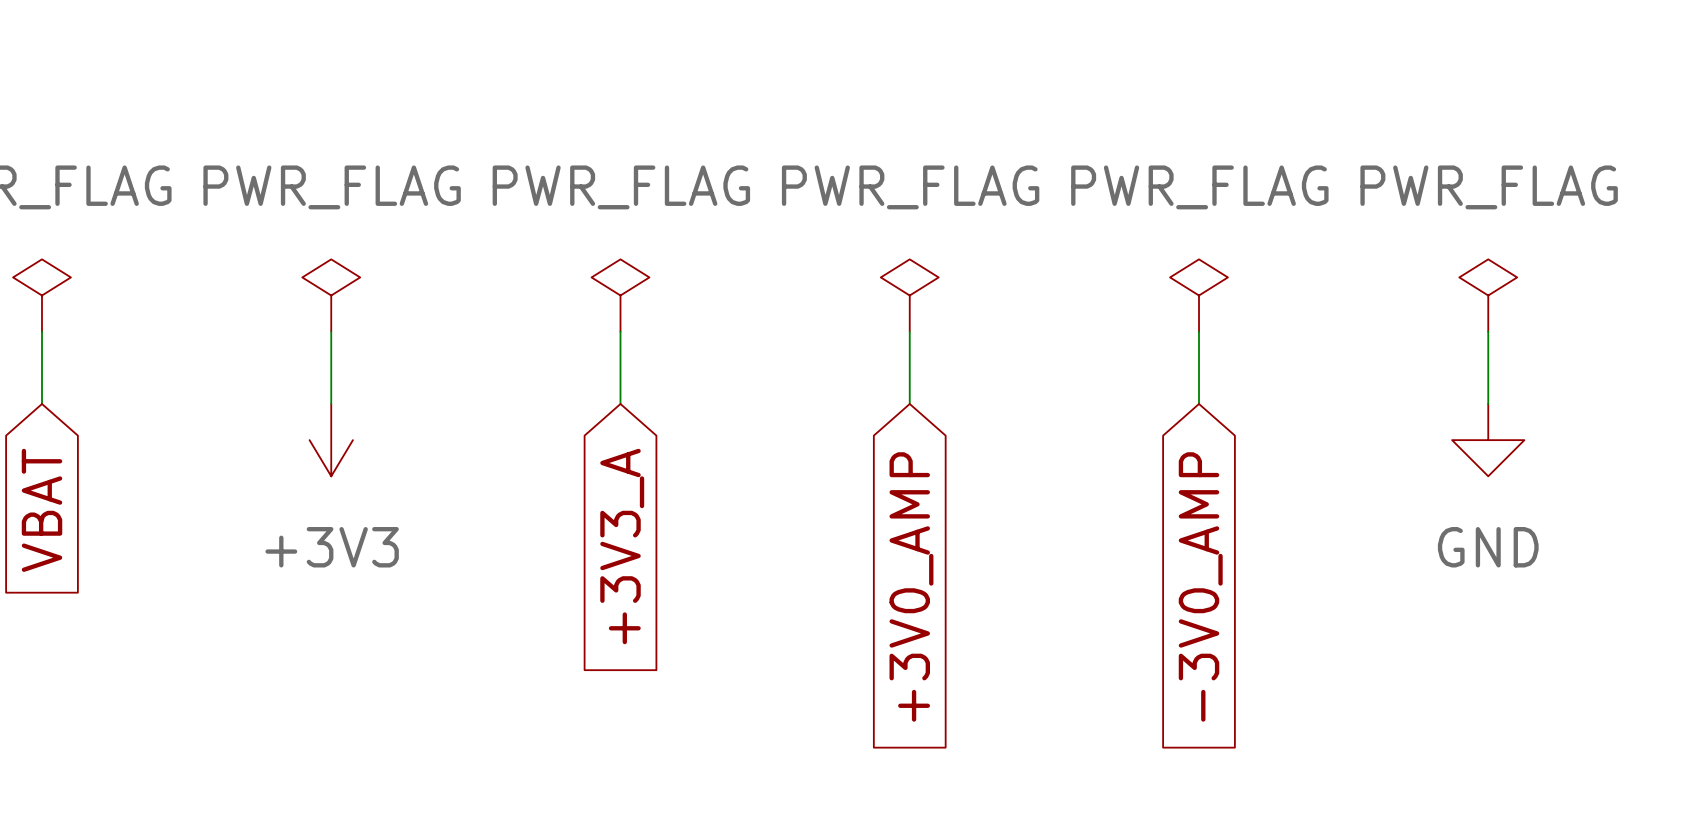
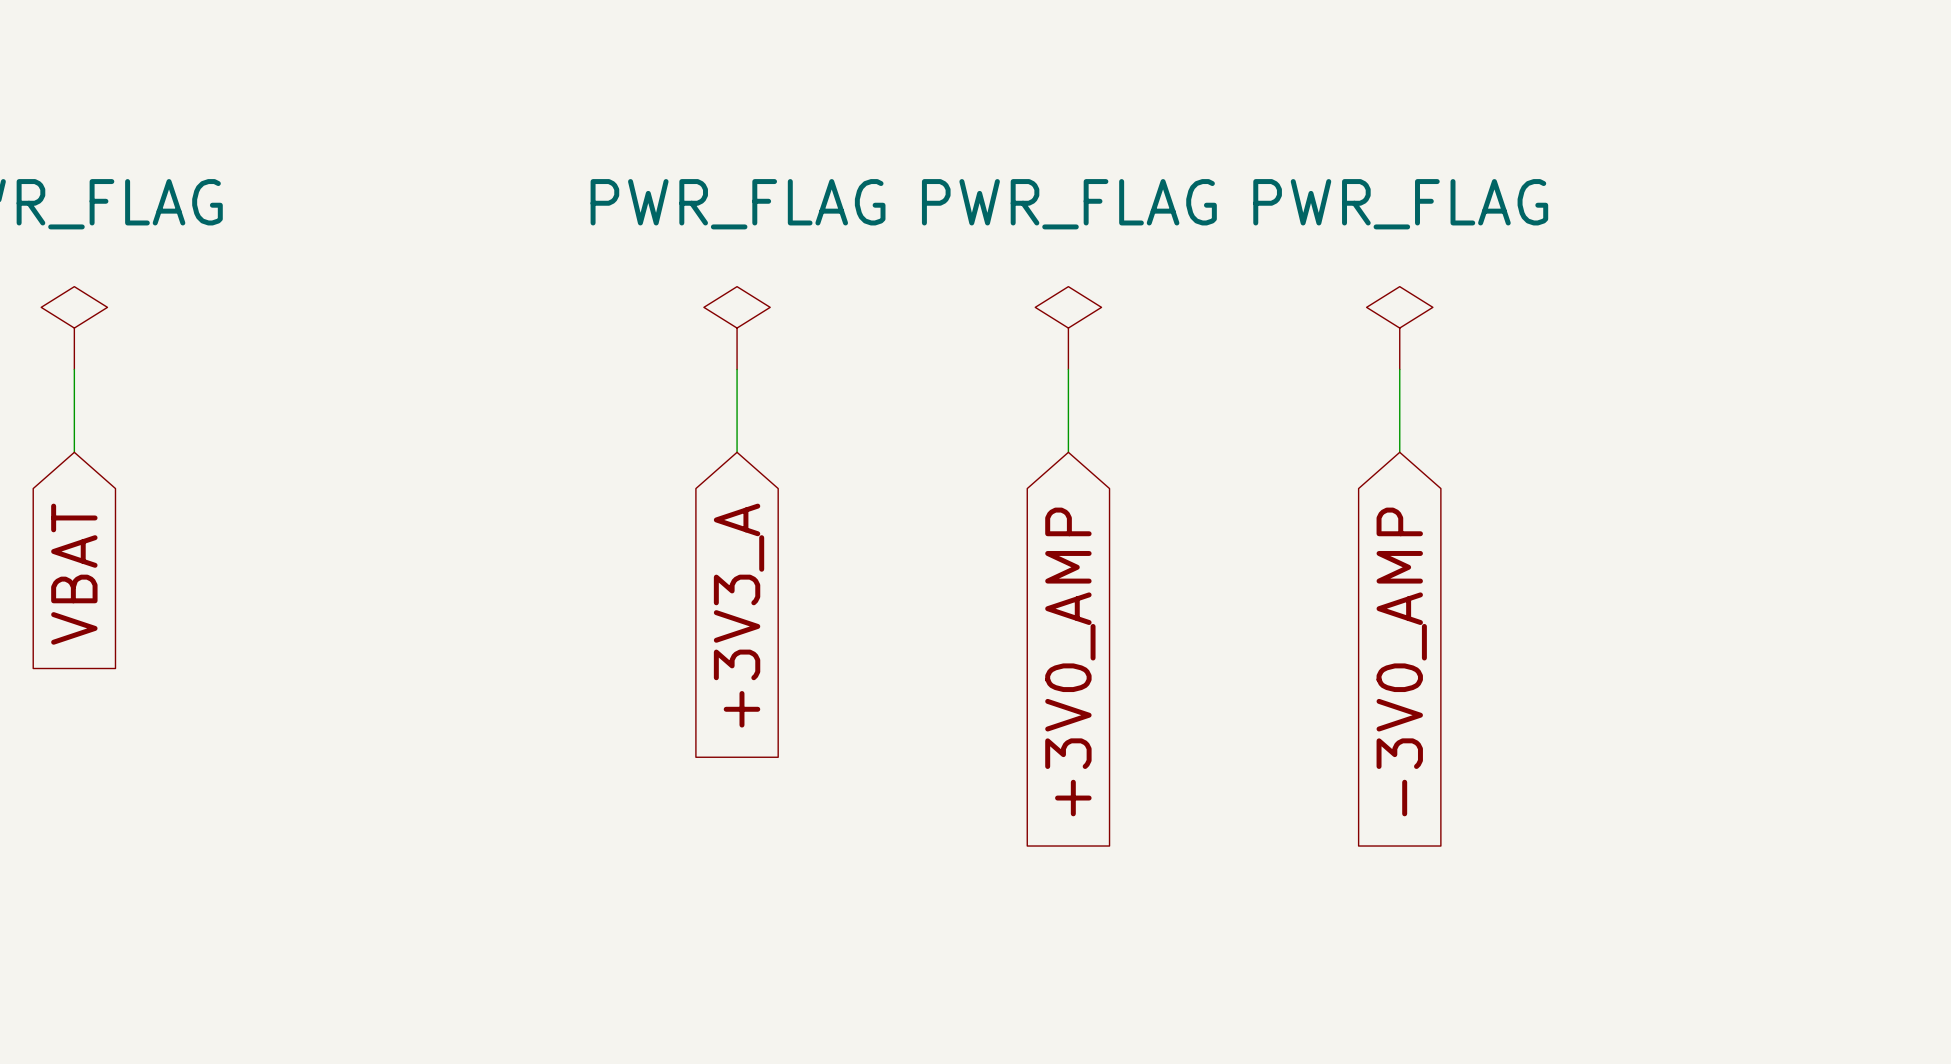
power symbol: PWR_FLAG (331, 295) -> none
power symbol: PWR_FLAG (1488, 295) -> none
wire: (331, 331) (331, 403) -> none
wire: (1488, 331) (1488, 403) -> none
power symbol: +3V3 (331, 440) -> none
power symbol: GND (1488, 440) -> none

